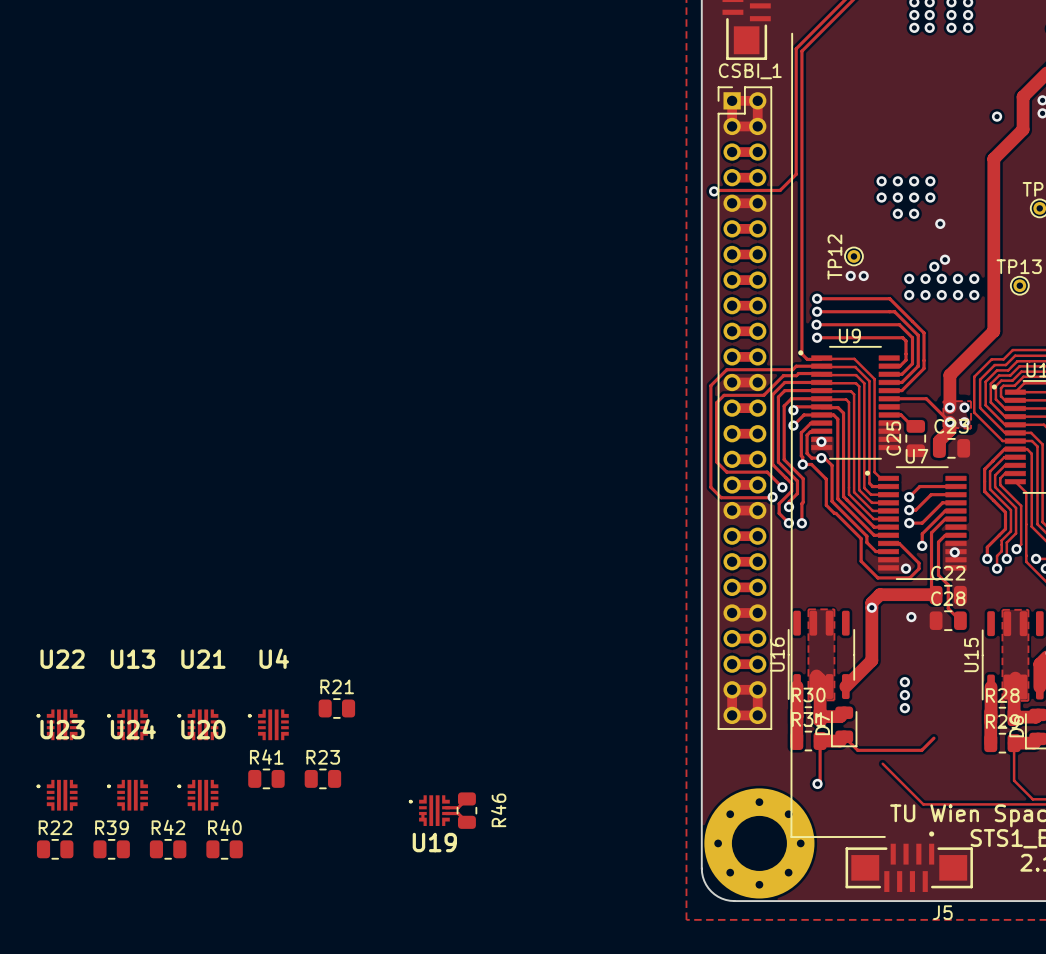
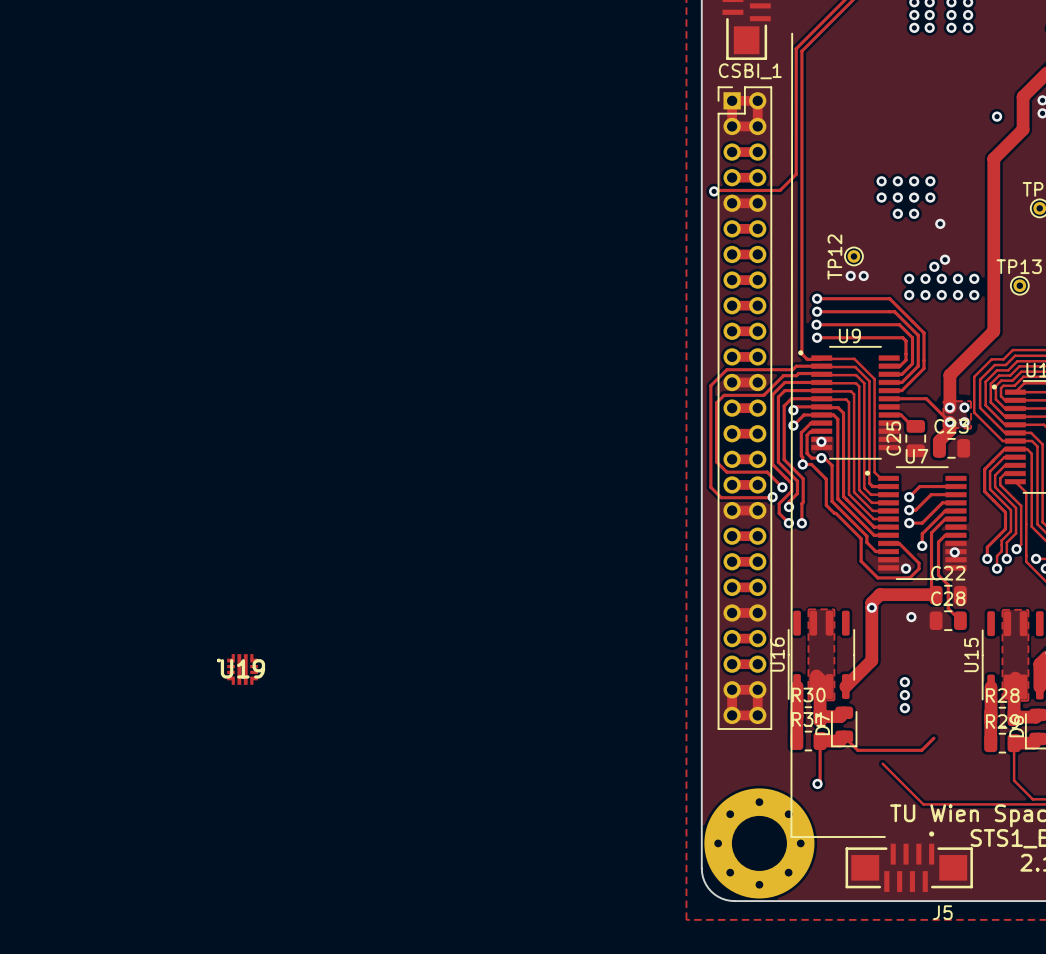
R21: (336, 708) -> none
U22: (57, 724) -> none
U13: (127, 724) -> none
U21: (197, 724) -> none
U4: (268, 724) -> none
R41: (266, 778) -> none
R23: (322, 778) -> none
U23: (57, 795) -> none
U24: (127, 795) -> none
U20: (197, 795) -> none
track: (466, 798) (458, 807) (445, 807) -> none
U19 position: (429, 810) -> (237, 669)
R46: (466, 810) -> none
track: (422, 813) (422, 819) -> none
track: (445, 813) (458, 813) (466, 822) -> none
U19 name position: U19 (434, 842) -> U19 (242, 668)
R22: (55, 849) -> none
R39: (111, 849) -> none
R42: (168, 849) -> none
R40: (224, 849) -> none

